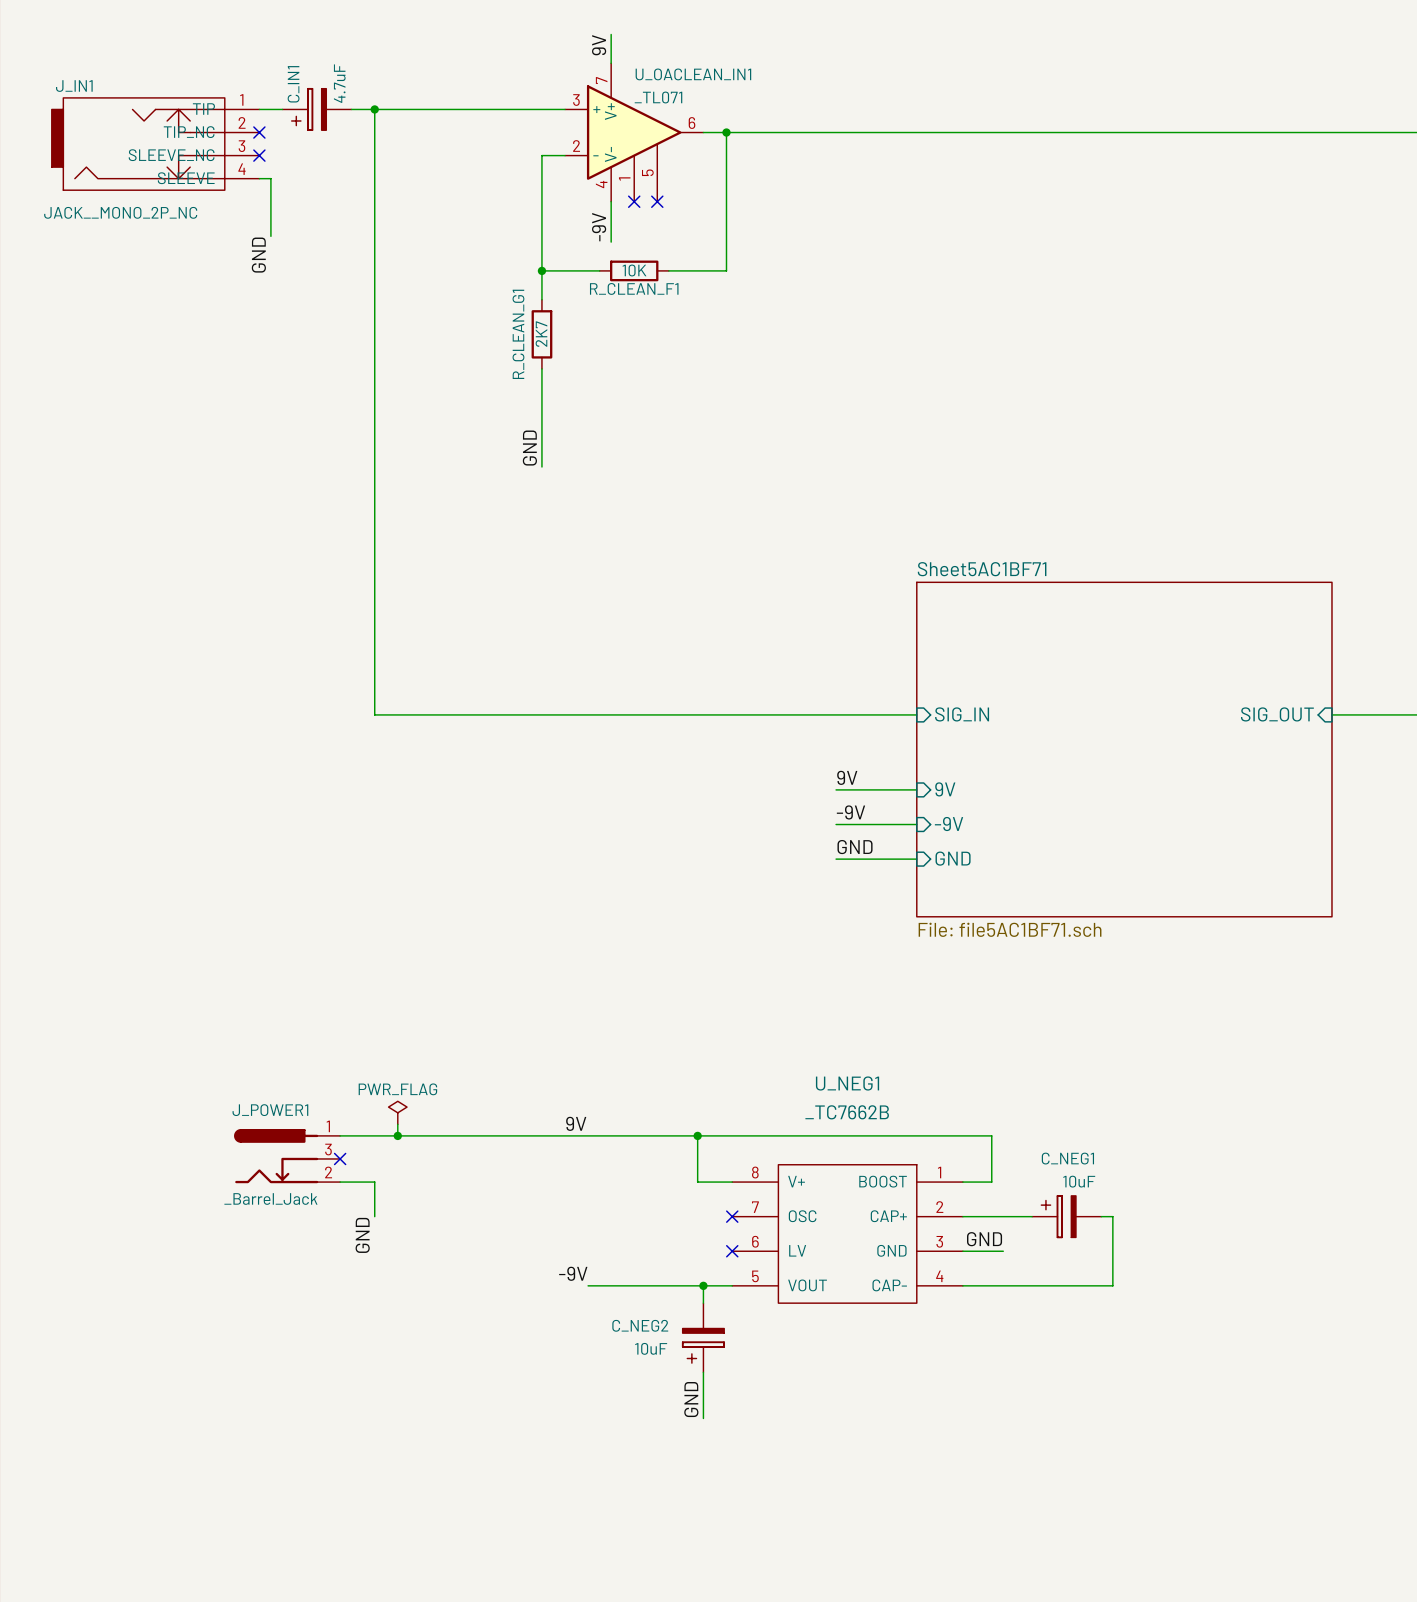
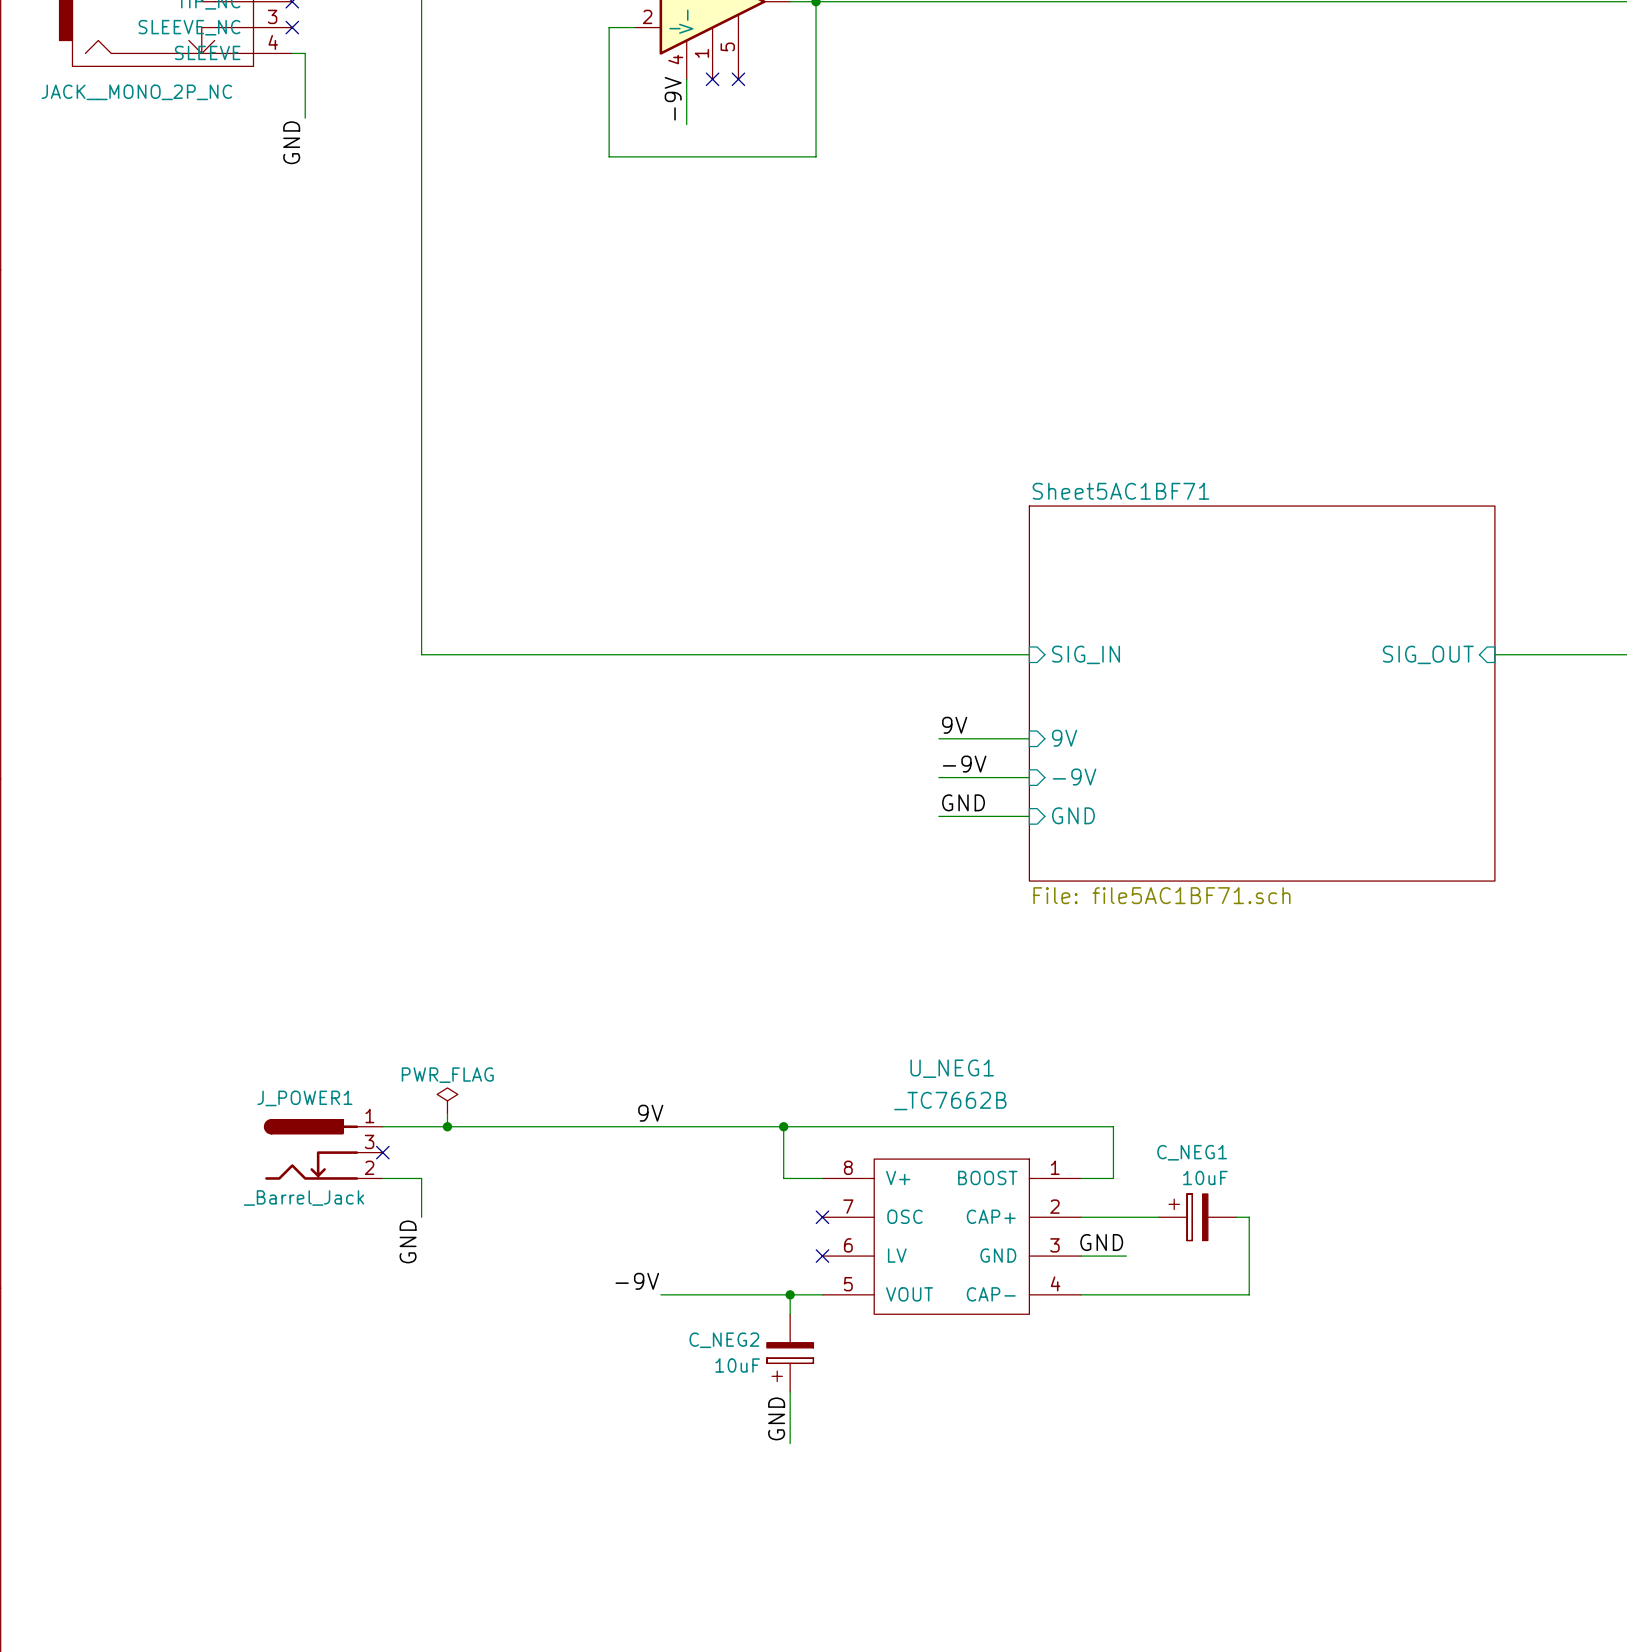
wire: (541, 270) (541, 299) -> none
junction: (541, 270) -> none
wire: none -> (673, 156) (751, 156)
R_CLEAN_F1: 10K (634, 270) -> none
R_CLEAN_G1: 2K7 (541, 334) -> none
wire: (541, 368) (541, 466) -> none
label: GND (529, 448) -> none

